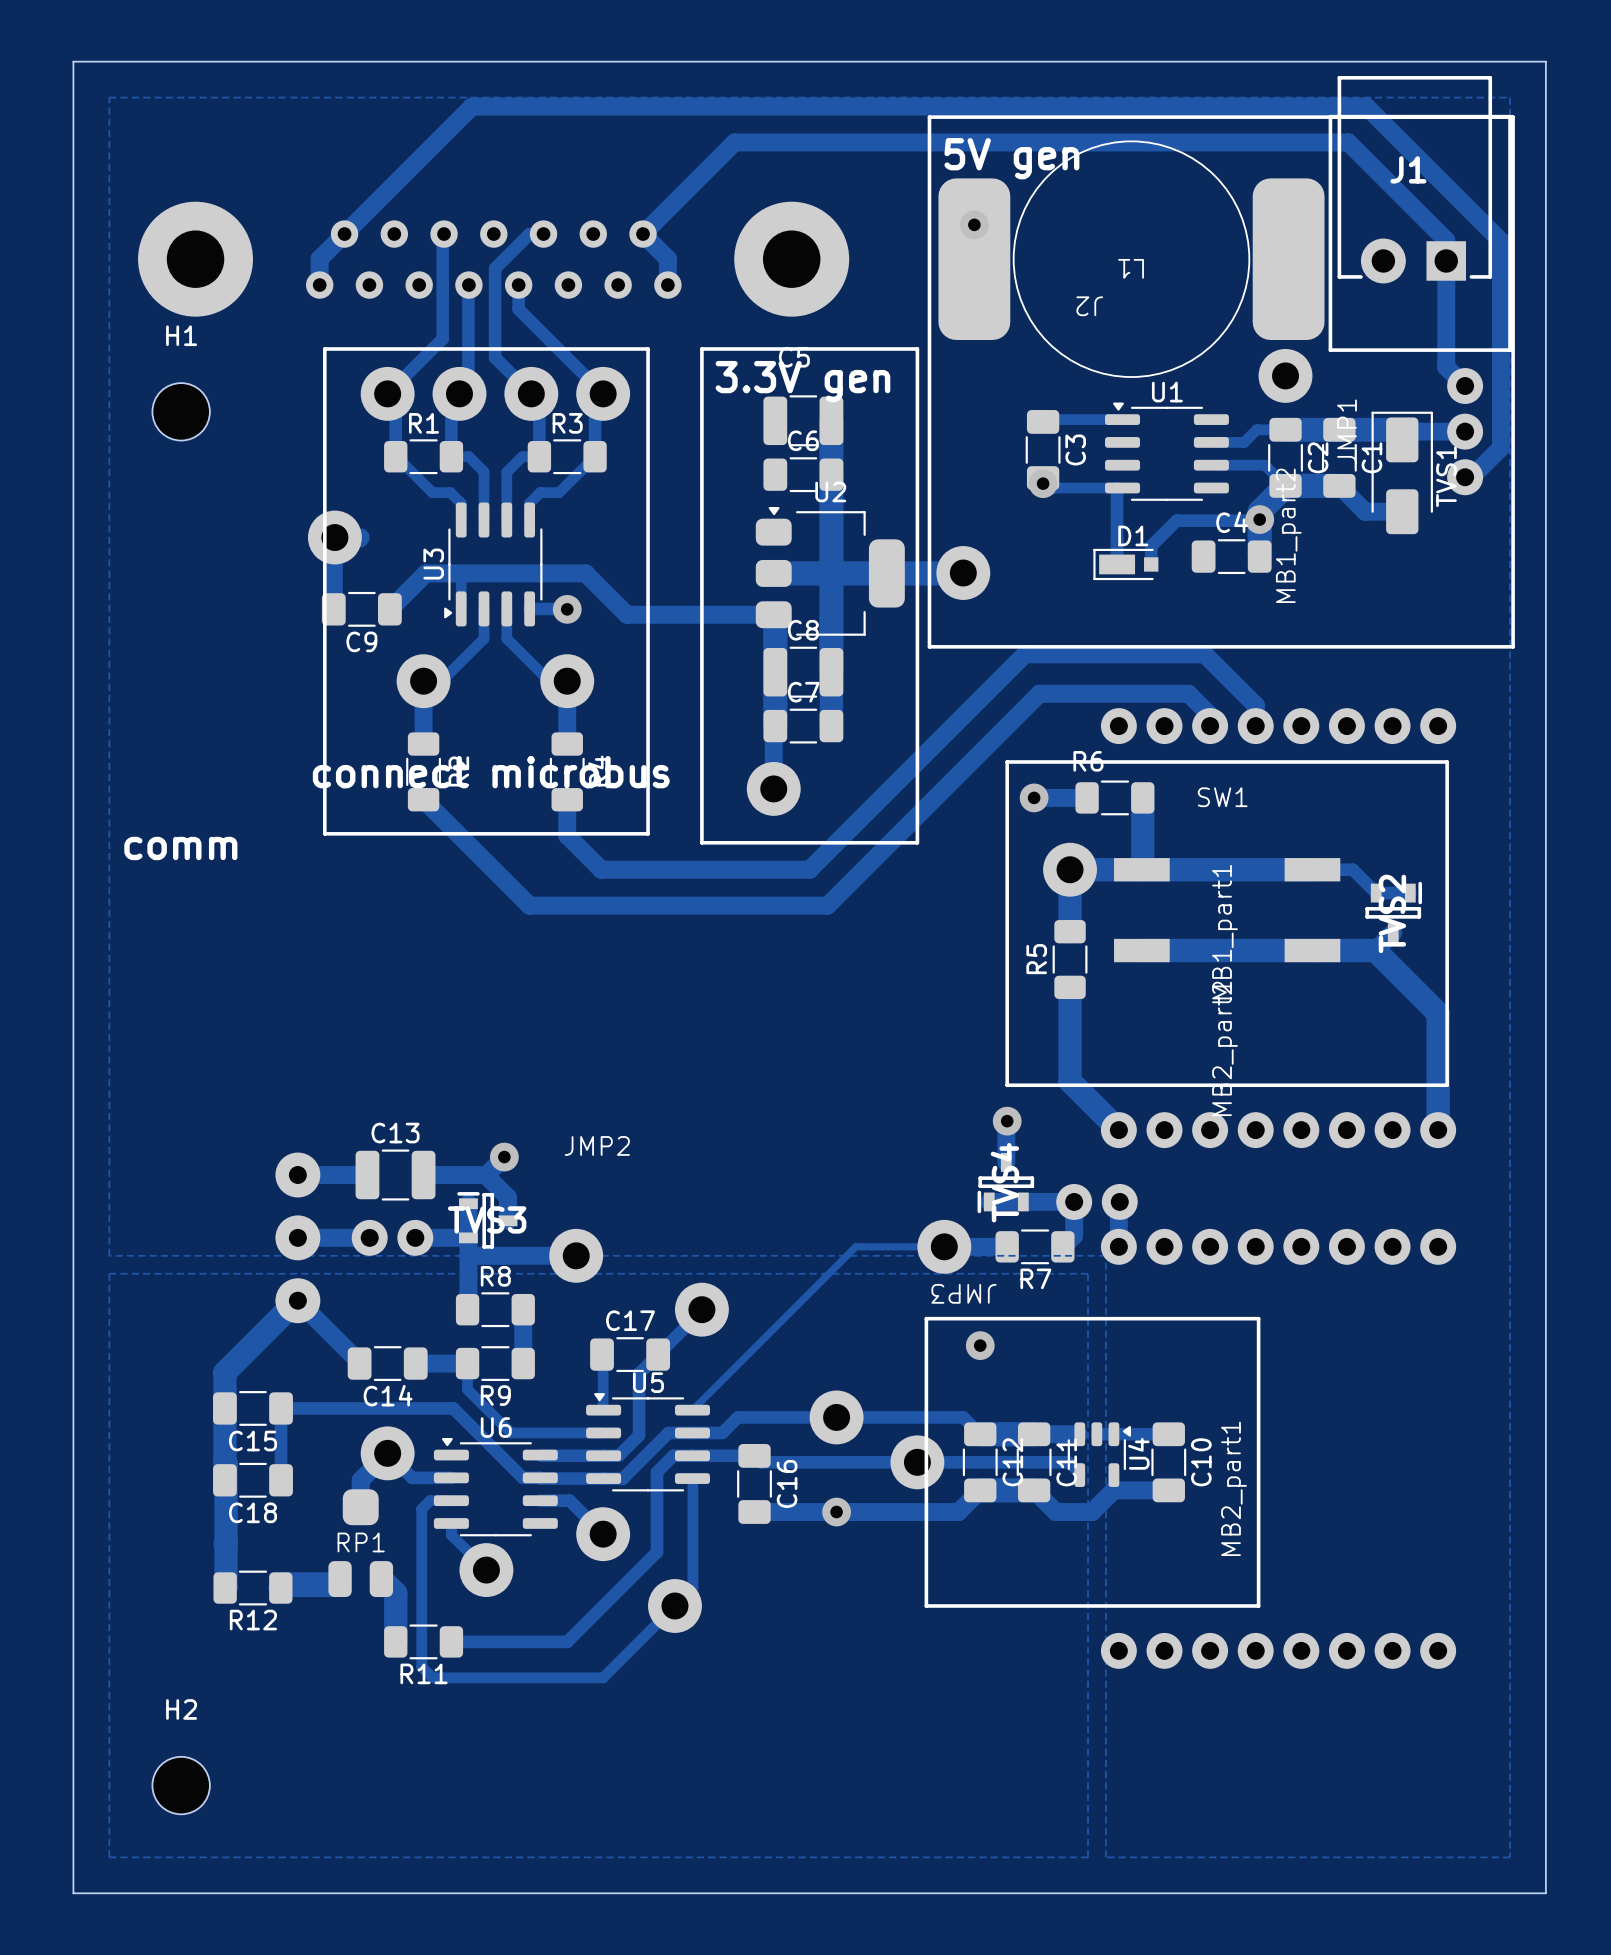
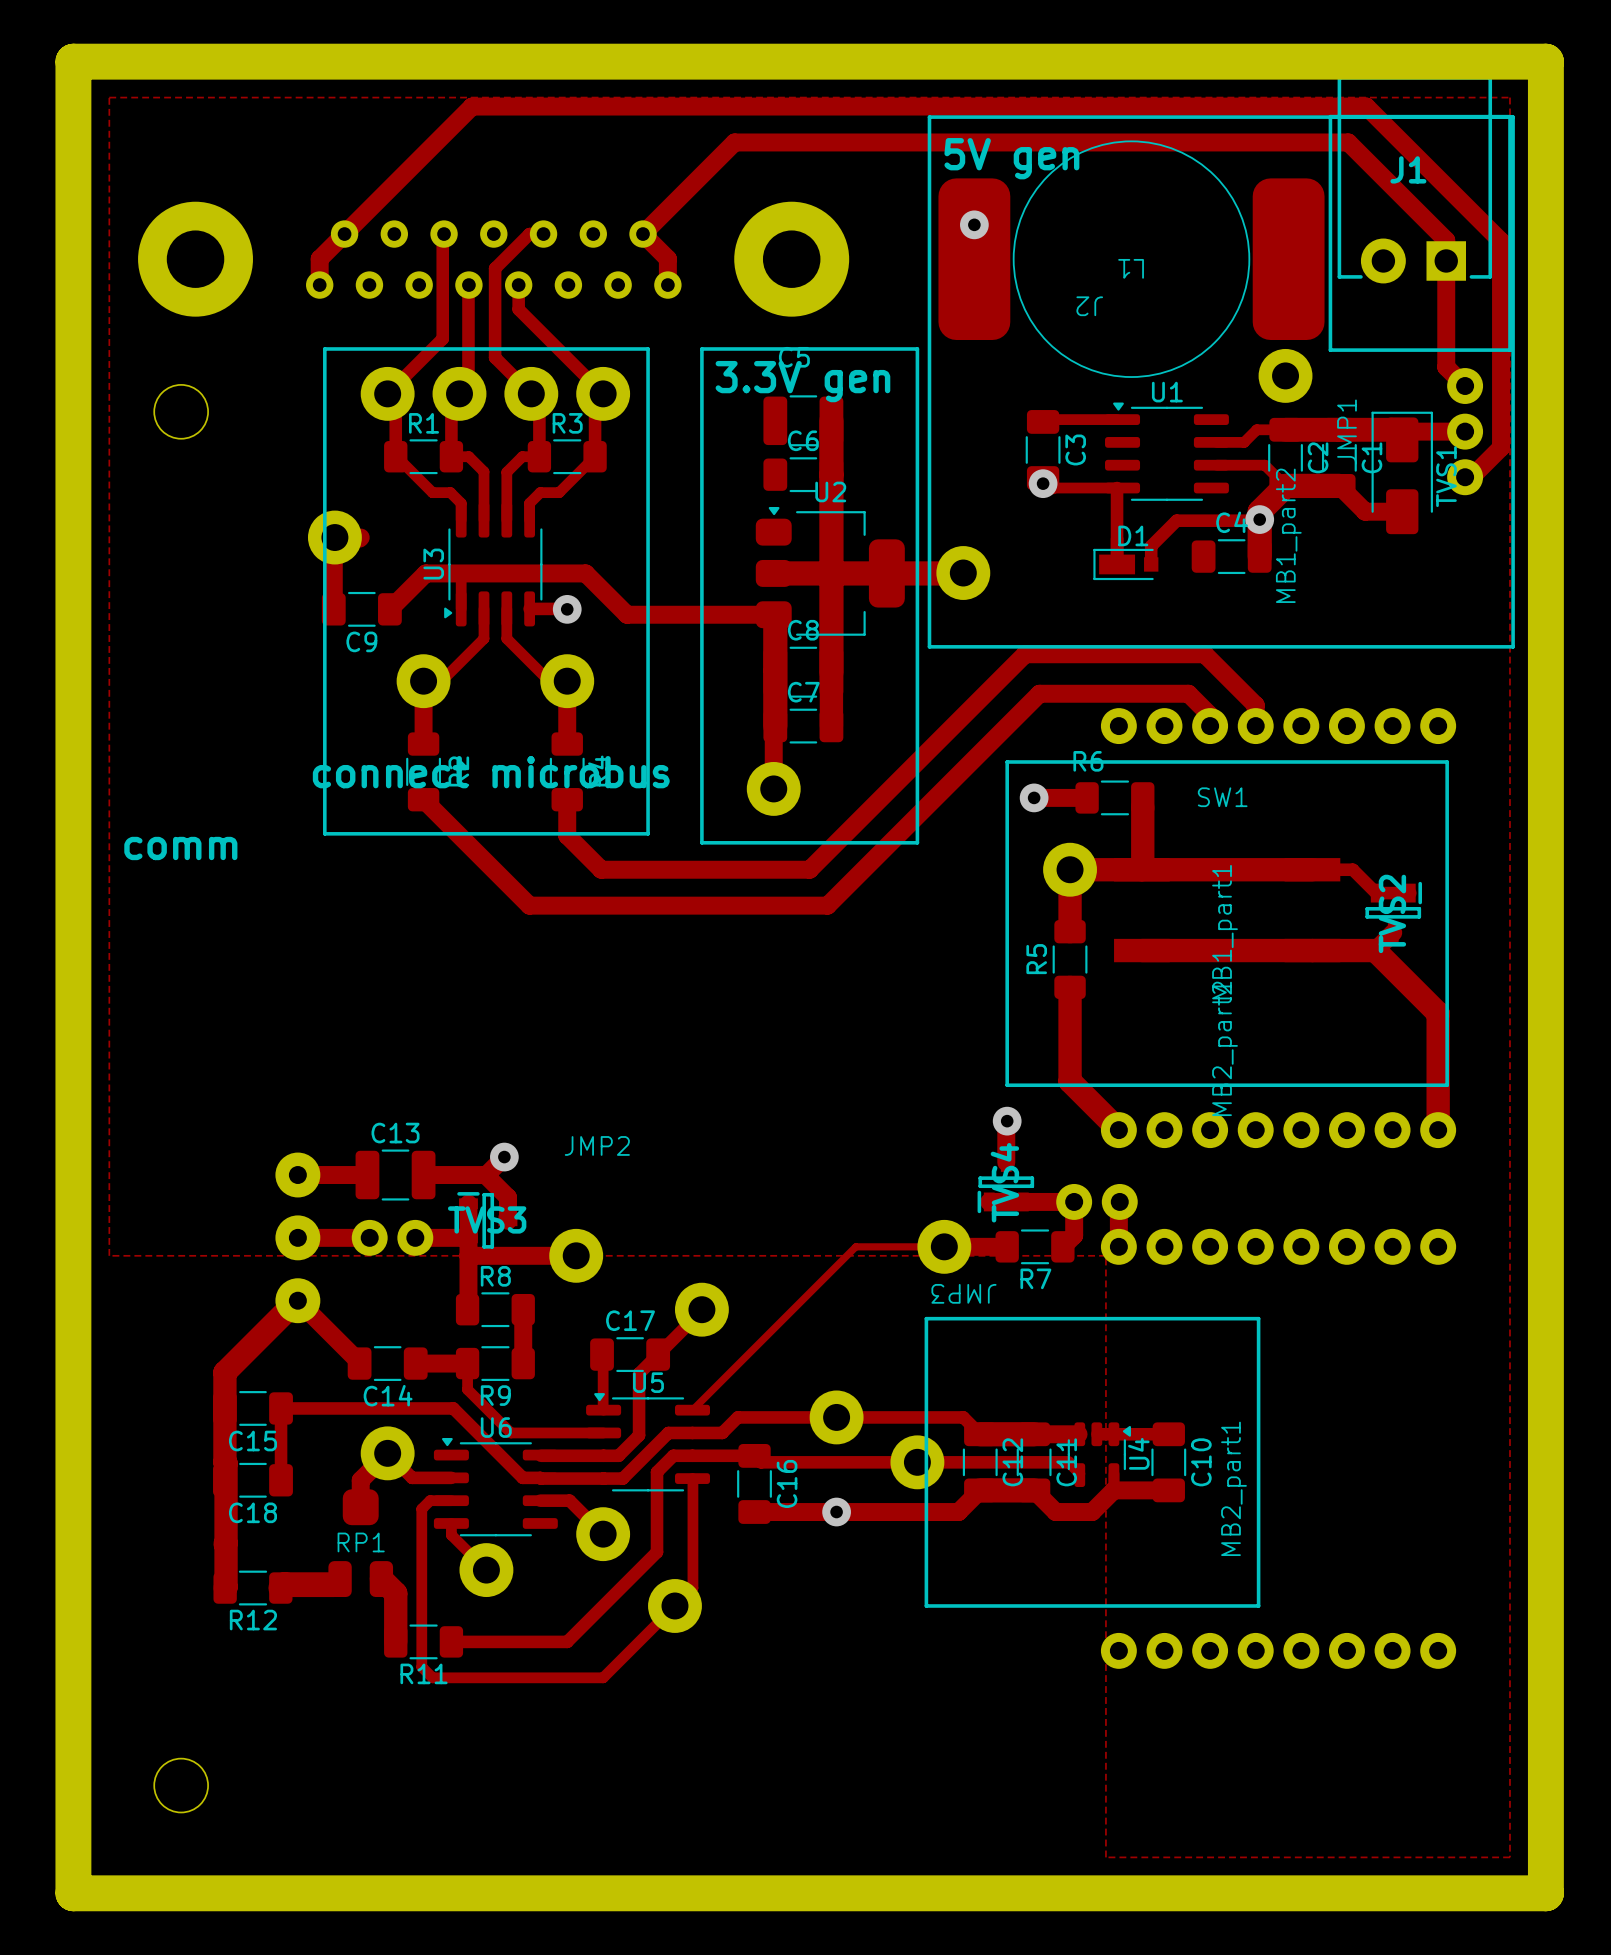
board edge width: thin (73, 61) (73, 1893) (1545, 1893) (1545, 61) (73, 61) -> thick (73, 61) (73, 1893) (1545, 1893) (1545, 61) (73, 61)
round board edge: none -> [153, 384, 209, 440]
H1: (181, 411) -> none
zone outline: (109, 1273) (1088, 1273) (1088, 1857) (109, 1857) (109, 1273) -> none
via: (980, 1345) -> none
round board edge: none -> [153, 1758, 209, 1813]
H2: (181, 1785) -> none

